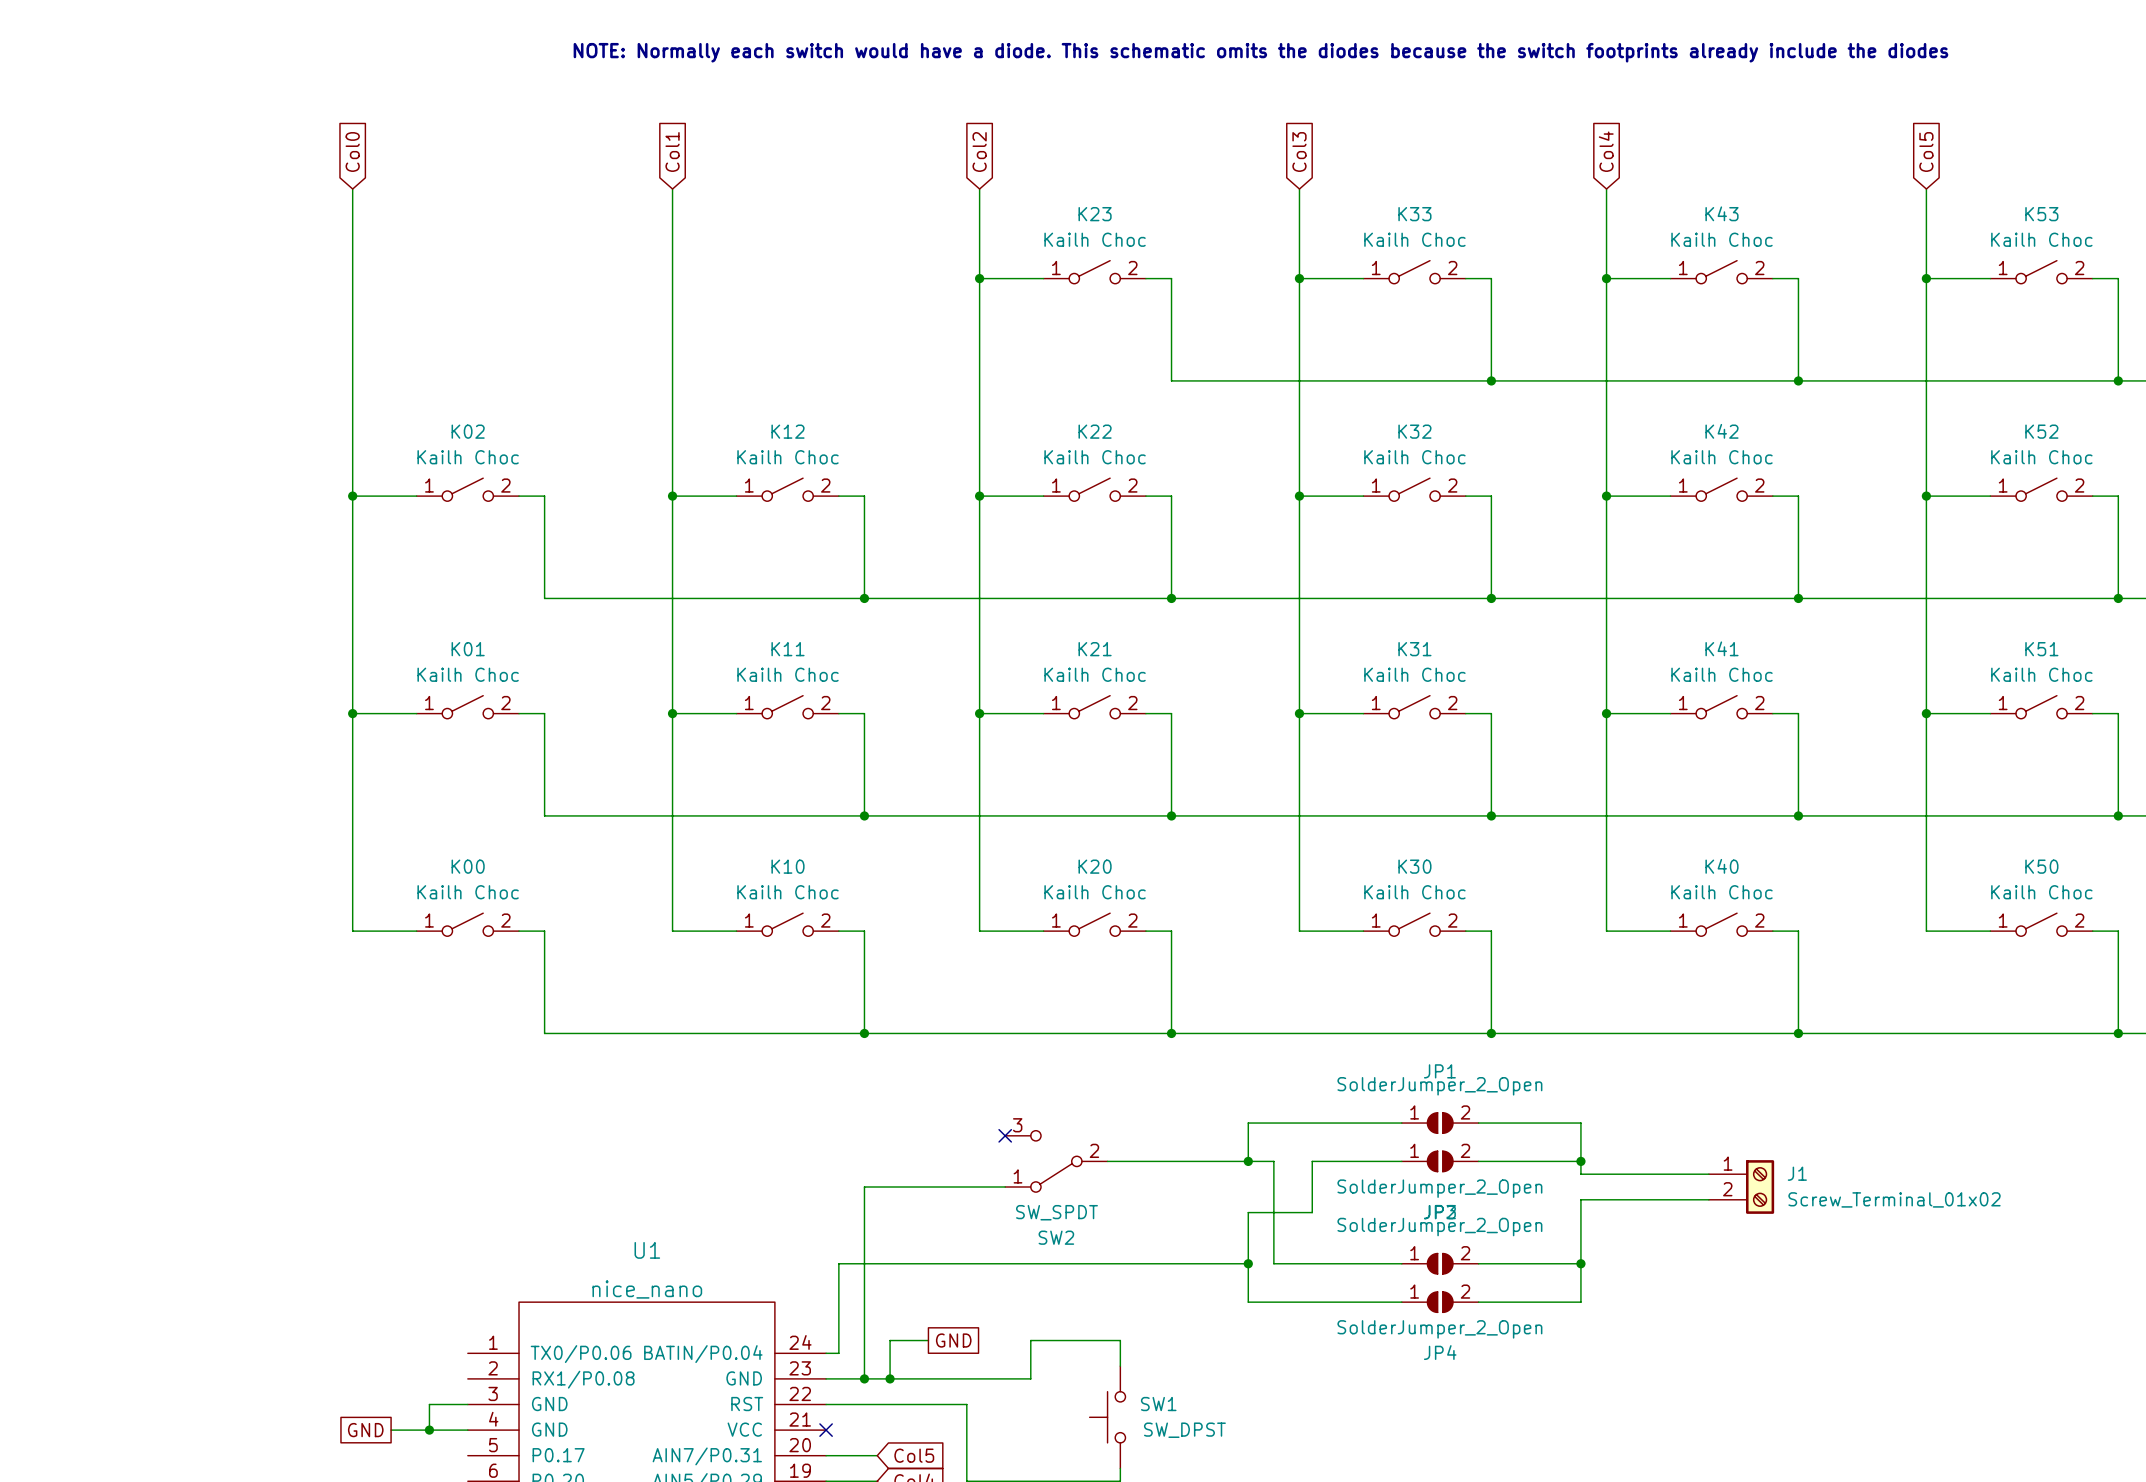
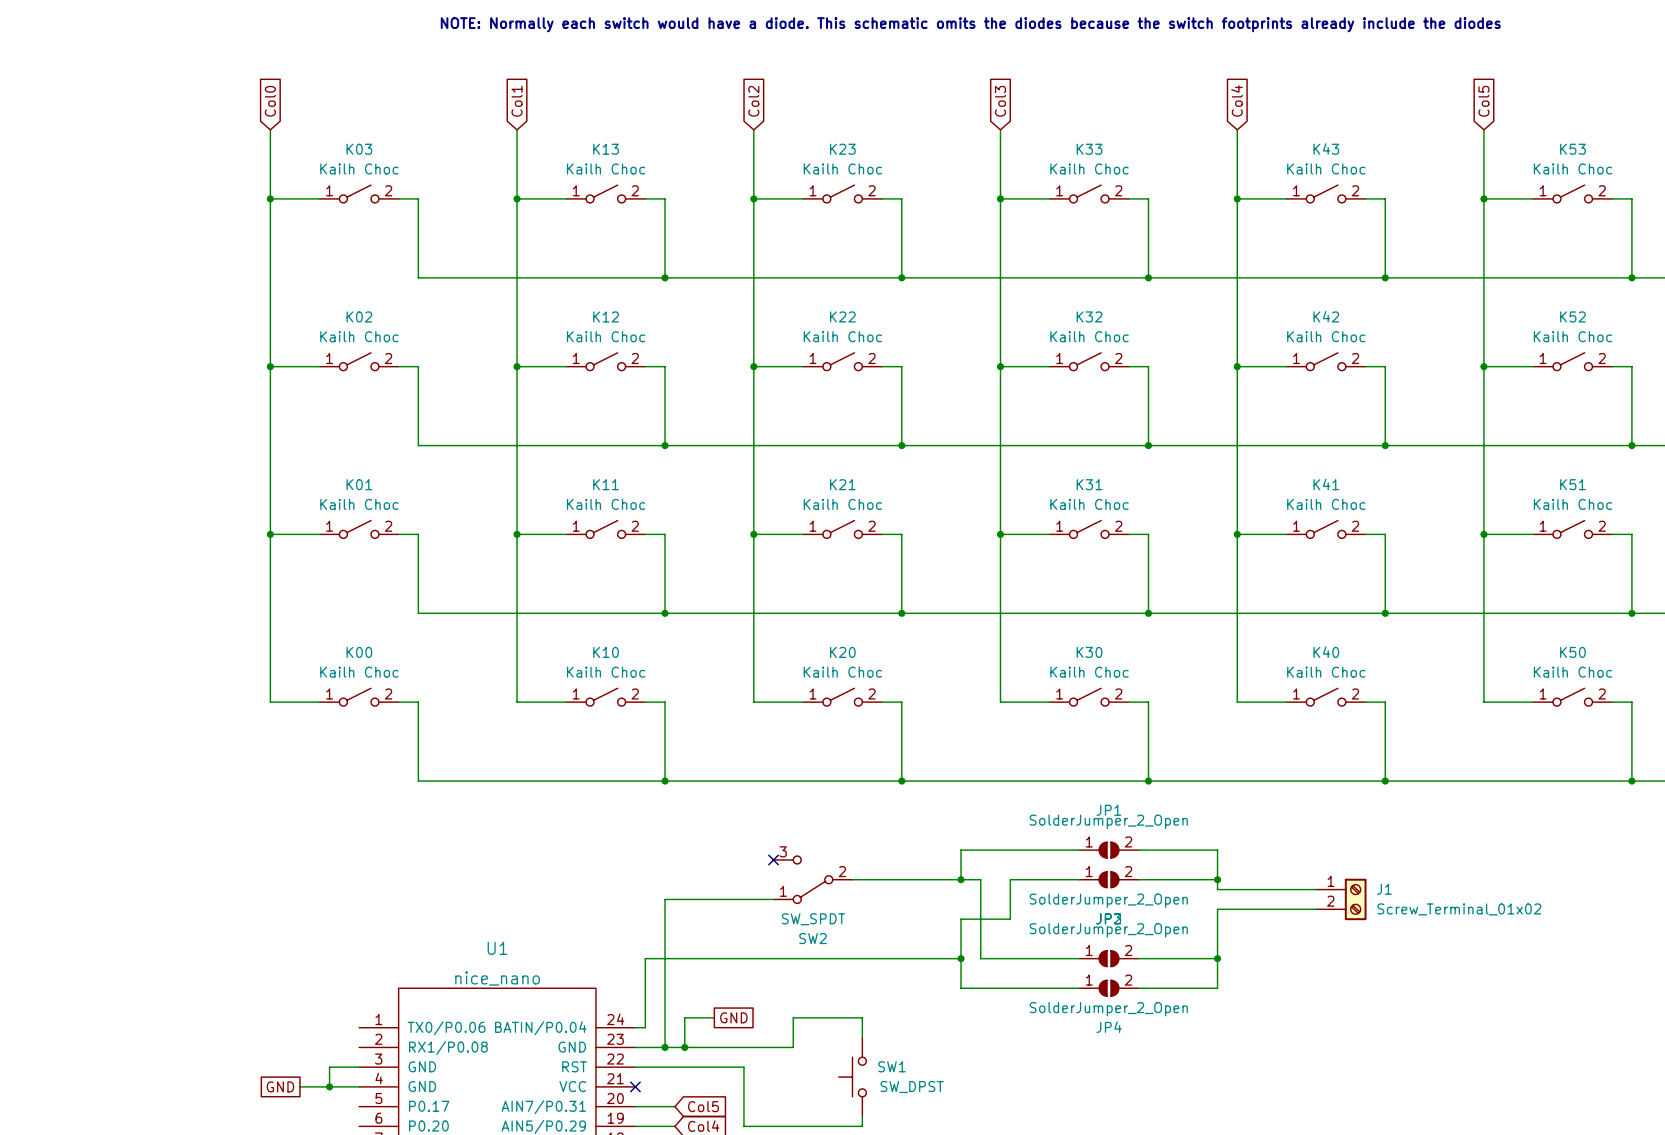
K03: none -> Kailh Choc (359, 194)
K13: none -> Kailh Choc (605, 194)
wire: none -> (270, 198) (319, 198)
junction: none -> (270, 198)
wire: none -> (398, 198) (418, 198) (418, 277) (901, 277)
wire: none -> (517, 198) (566, 198)
junction: none -> (517, 198)
wire: none -> (645, 198) (665, 198) (665, 277)
junction: none -> (665, 277)
junction: none -> (901, 277)

